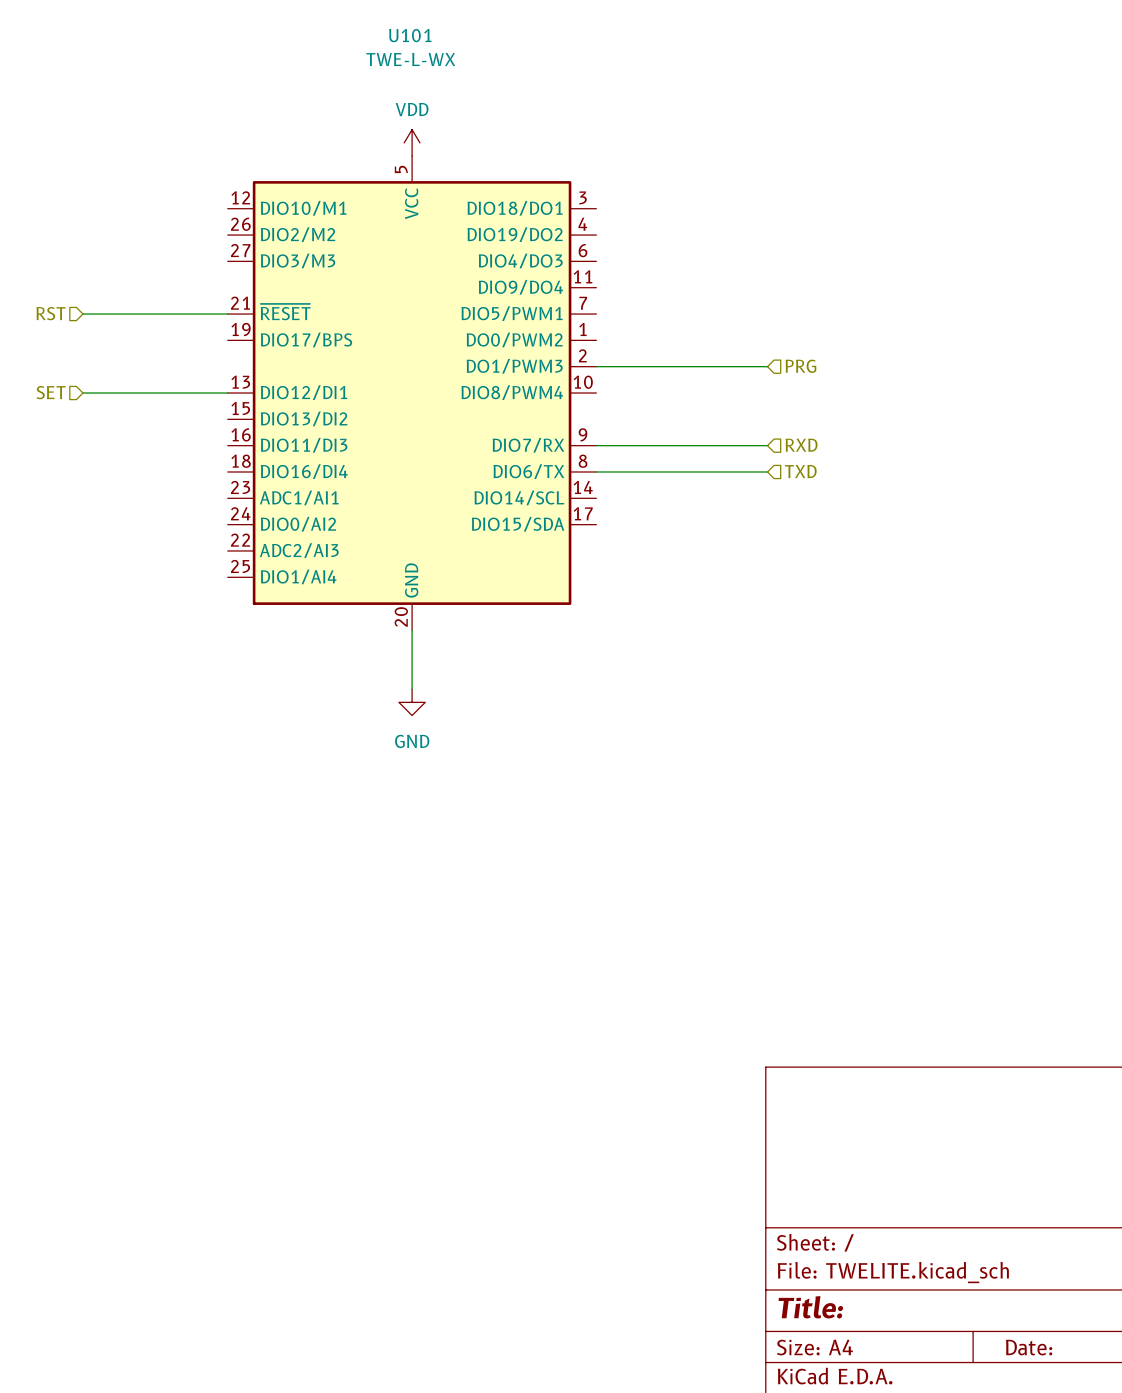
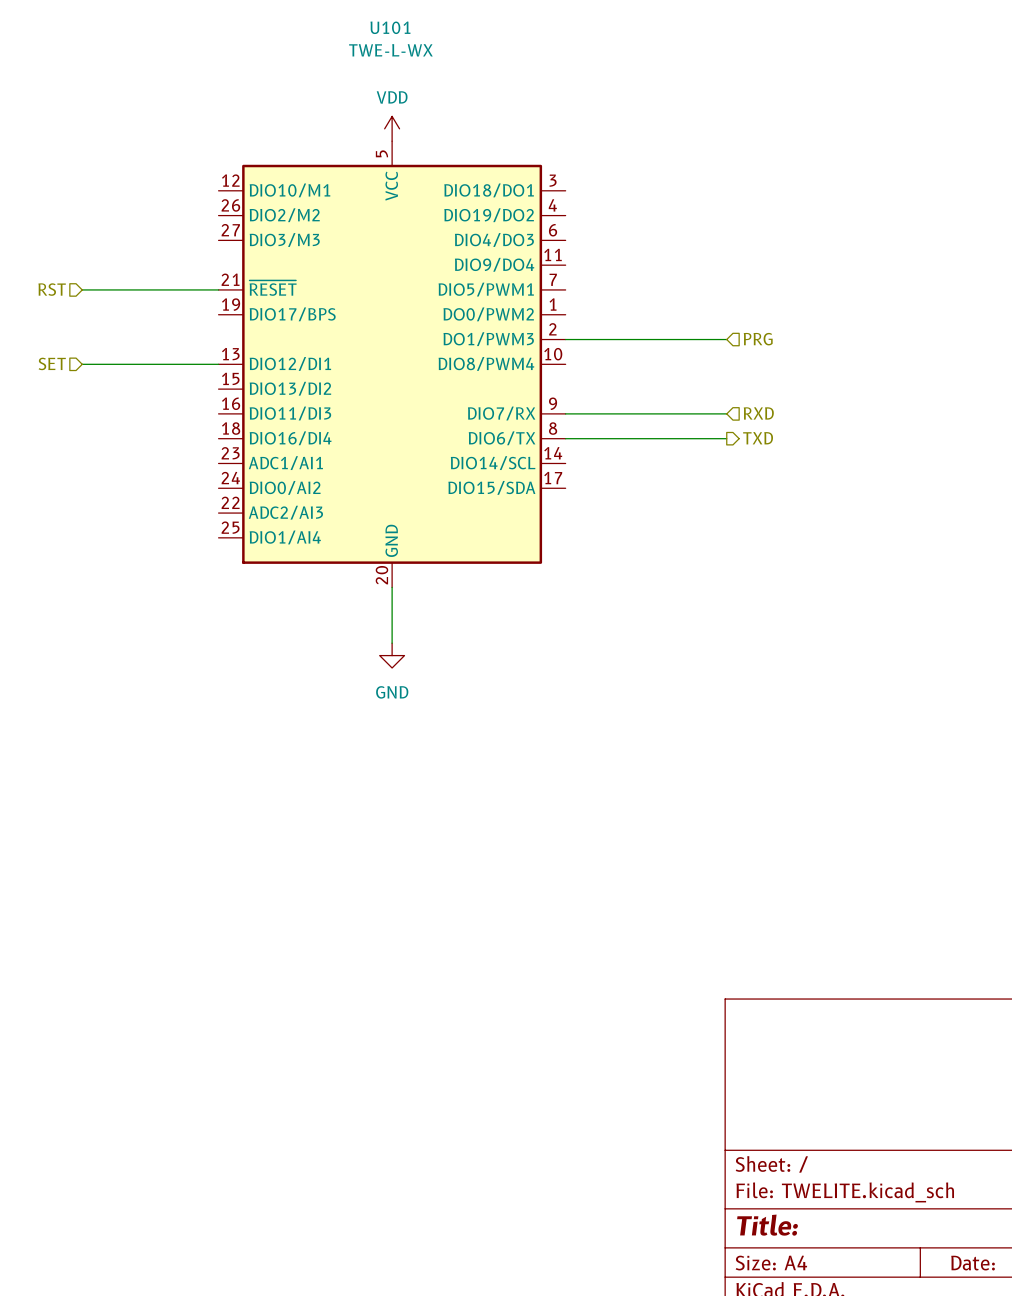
hierarchical label shape: input (800, 471) -> output (758, 438)

